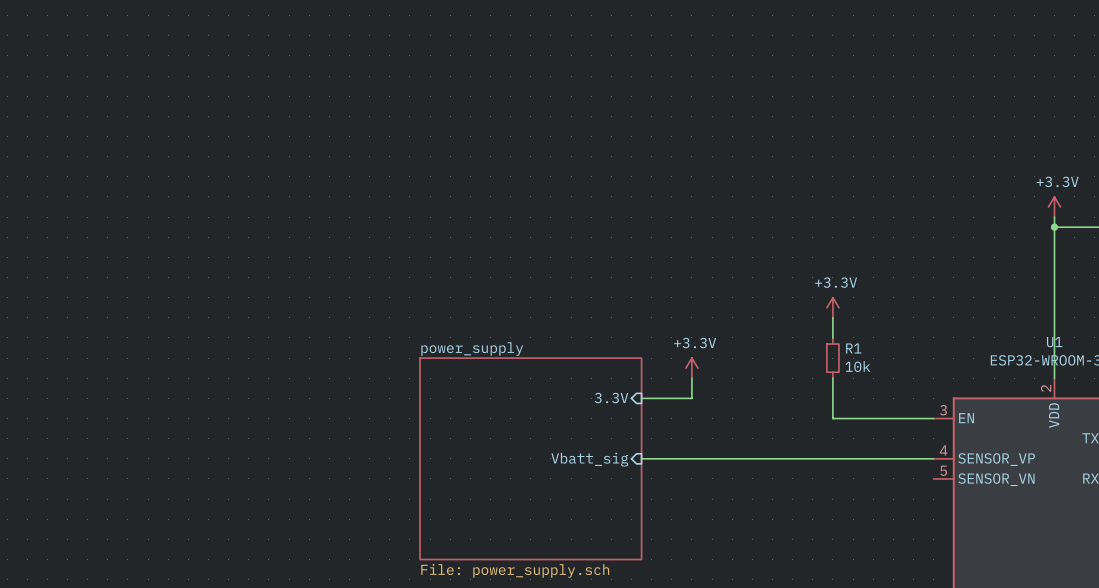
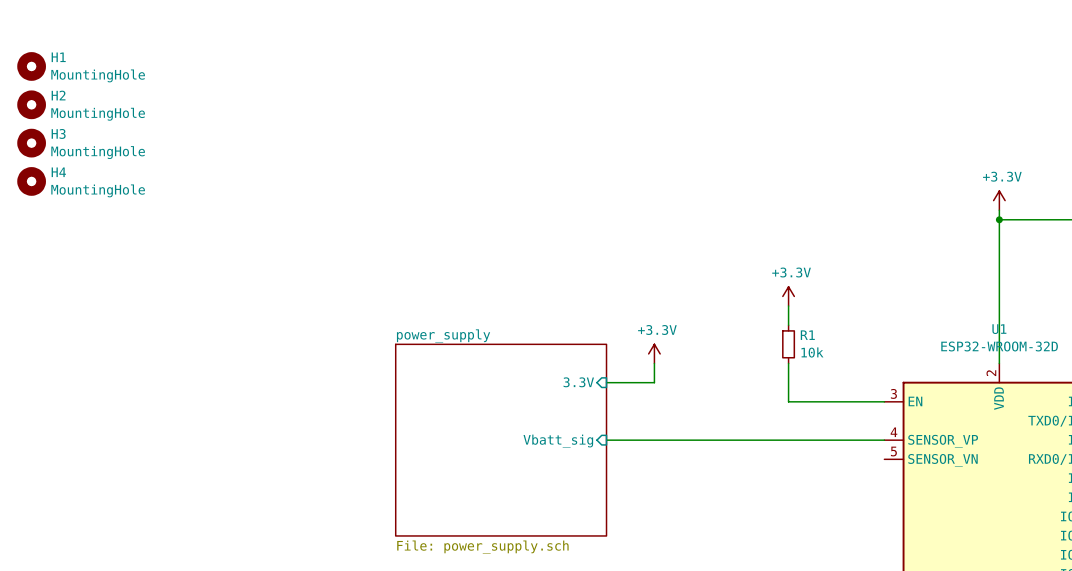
H1: none -> MountingHole (31, 66)
H2: none -> MountingHole (31, 104)
H3: none -> MountingHole (31, 143)
H4: none -> MountingHole (31, 181)

